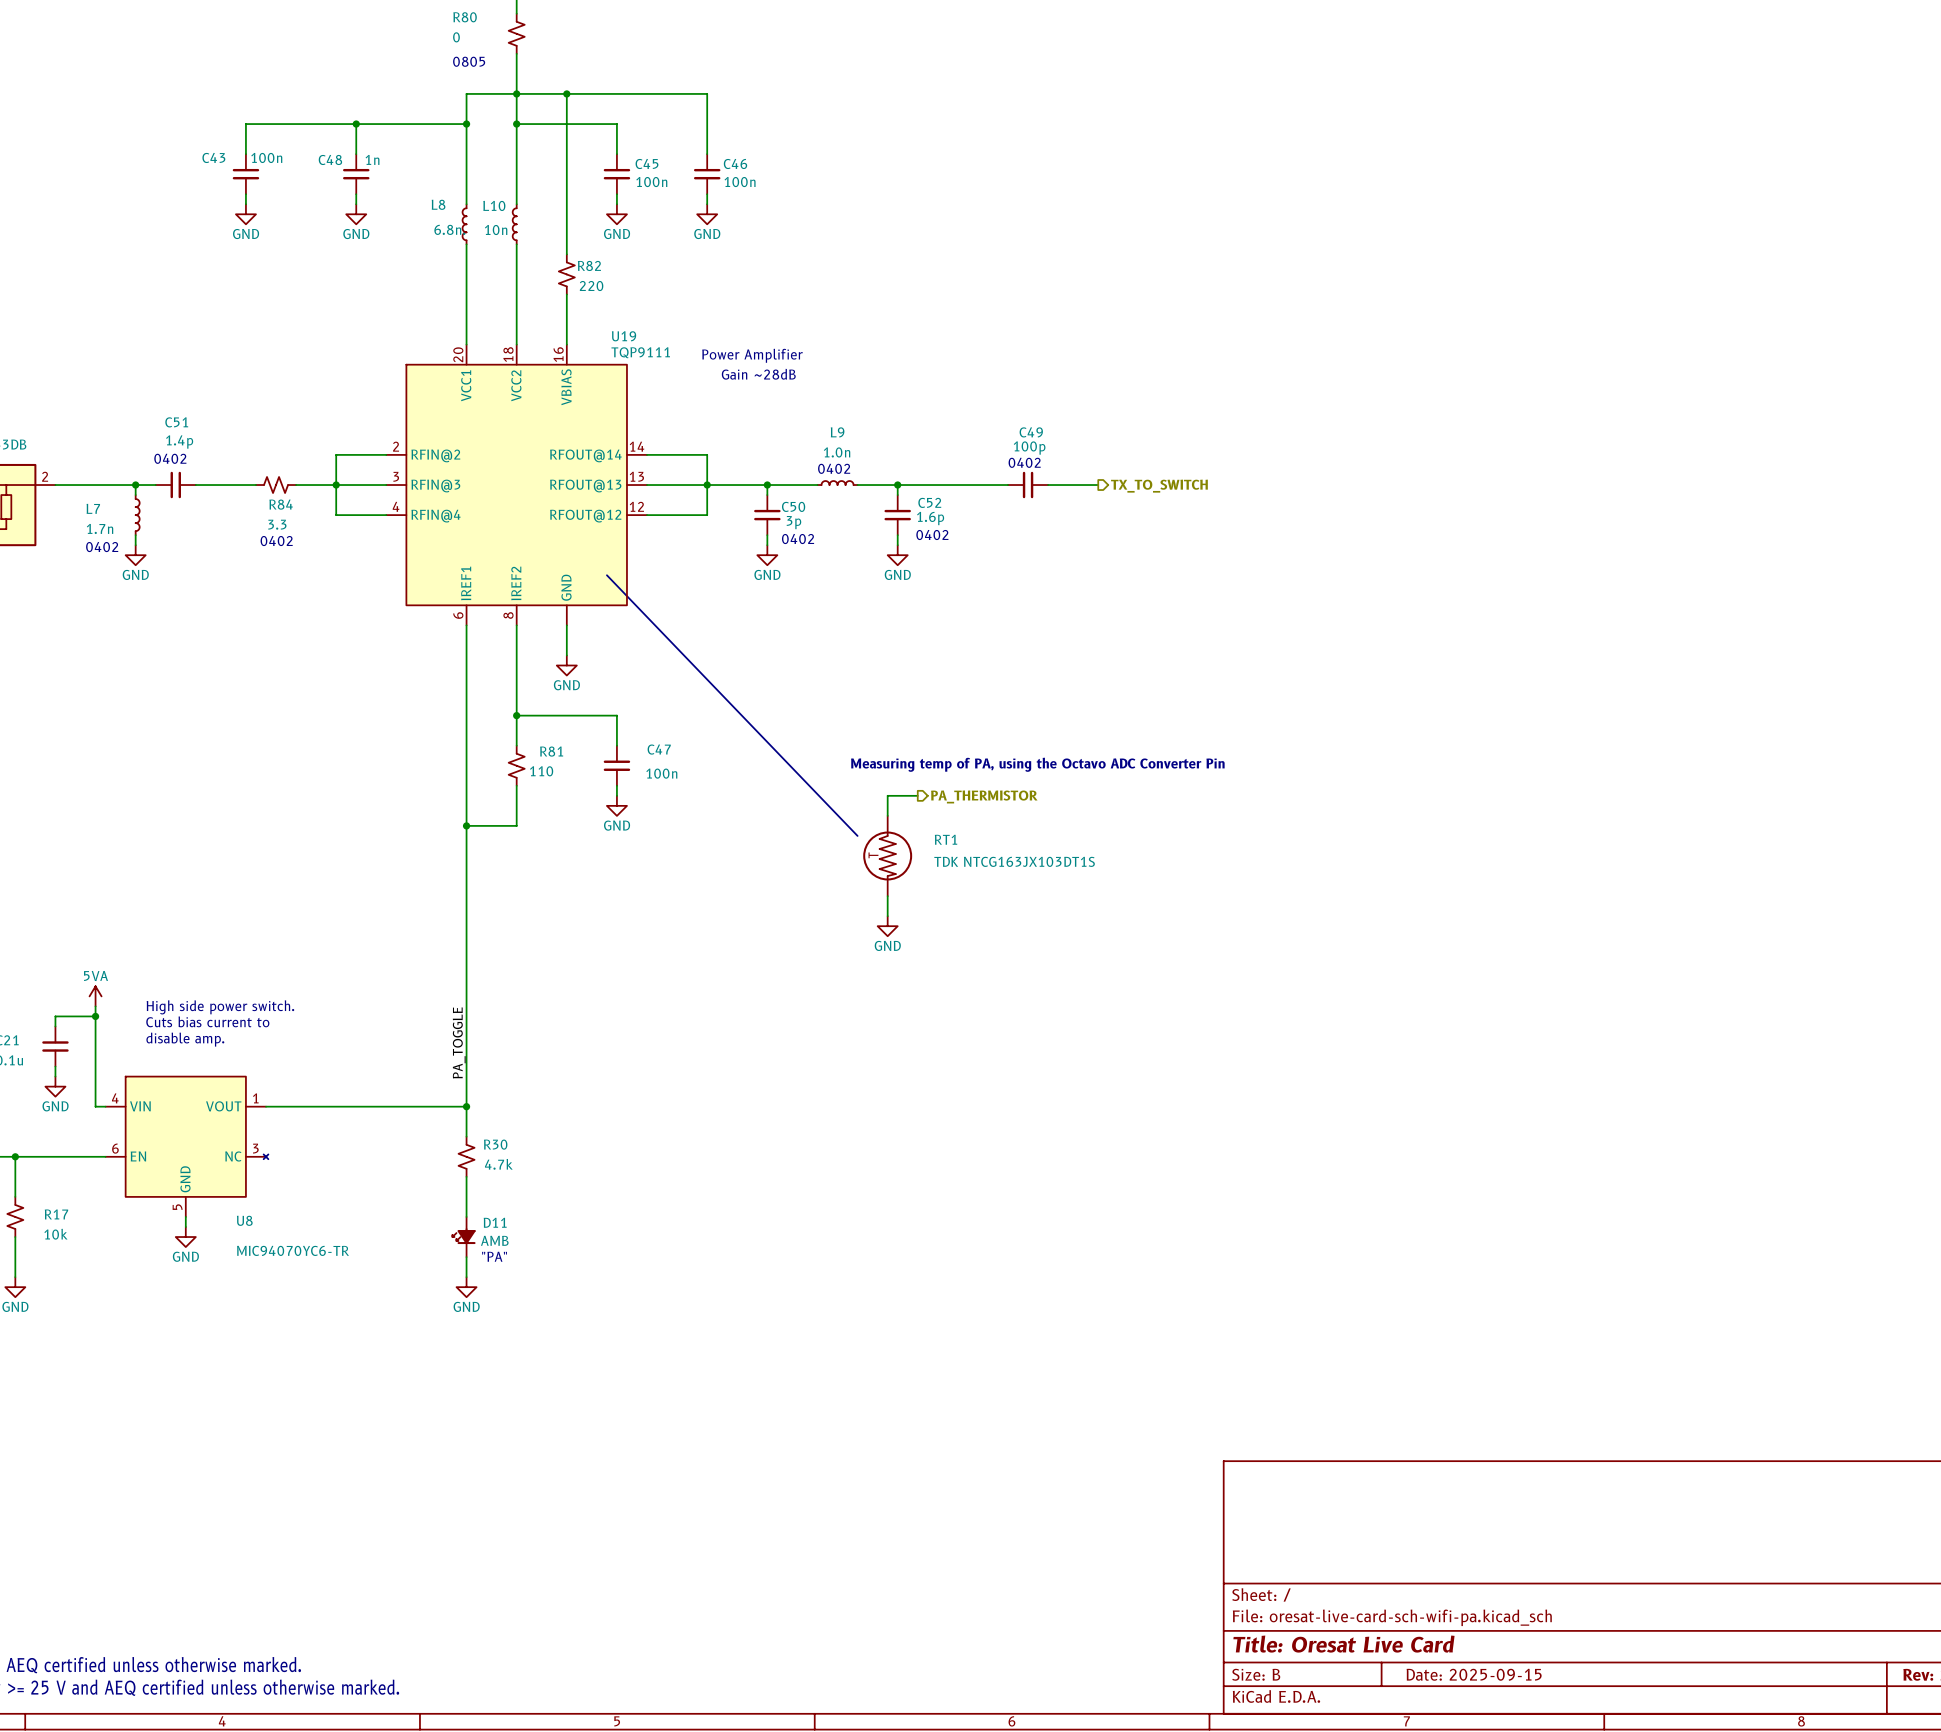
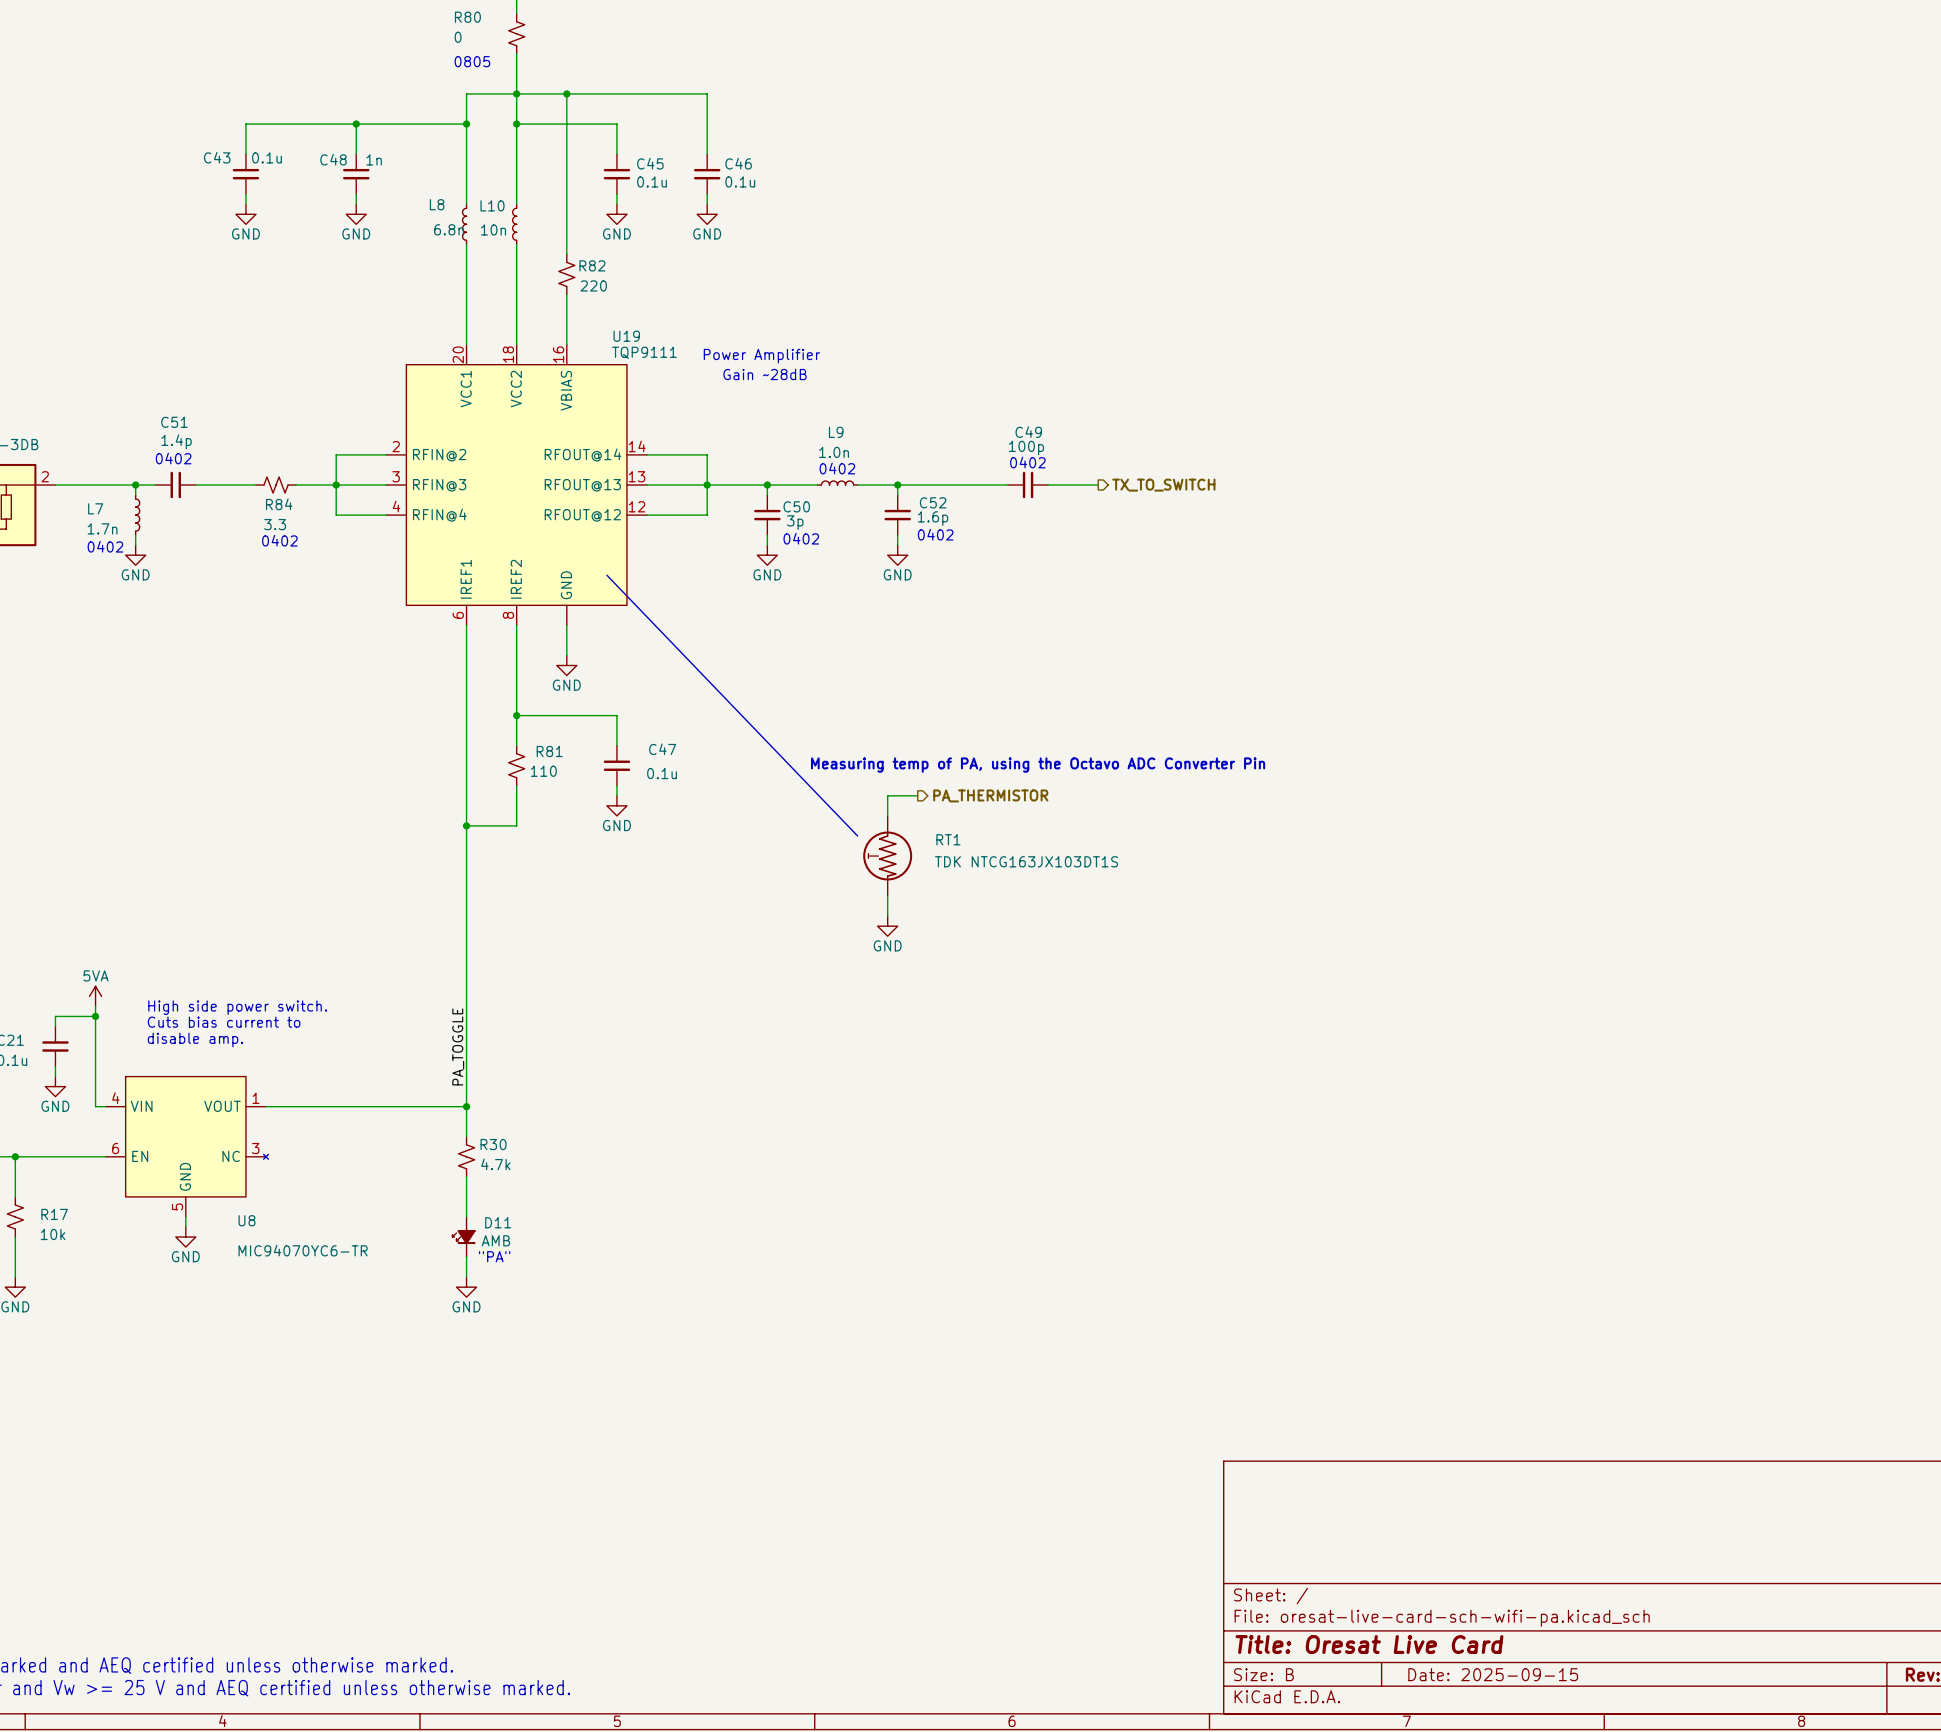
C43 value: 100n (266, 157) -> 0.1u (266, 157)
C45 value: 100n (651, 182) -> 0.1u (652, 181)
C46 value: 100n (740, 182) -> 0.1u (740, 181)
L8 value: 6.8n. (449, 229) -> 6.8n (449, 229)
C47 value: 100n (661, 773) -> 0.1u (662, 773)

